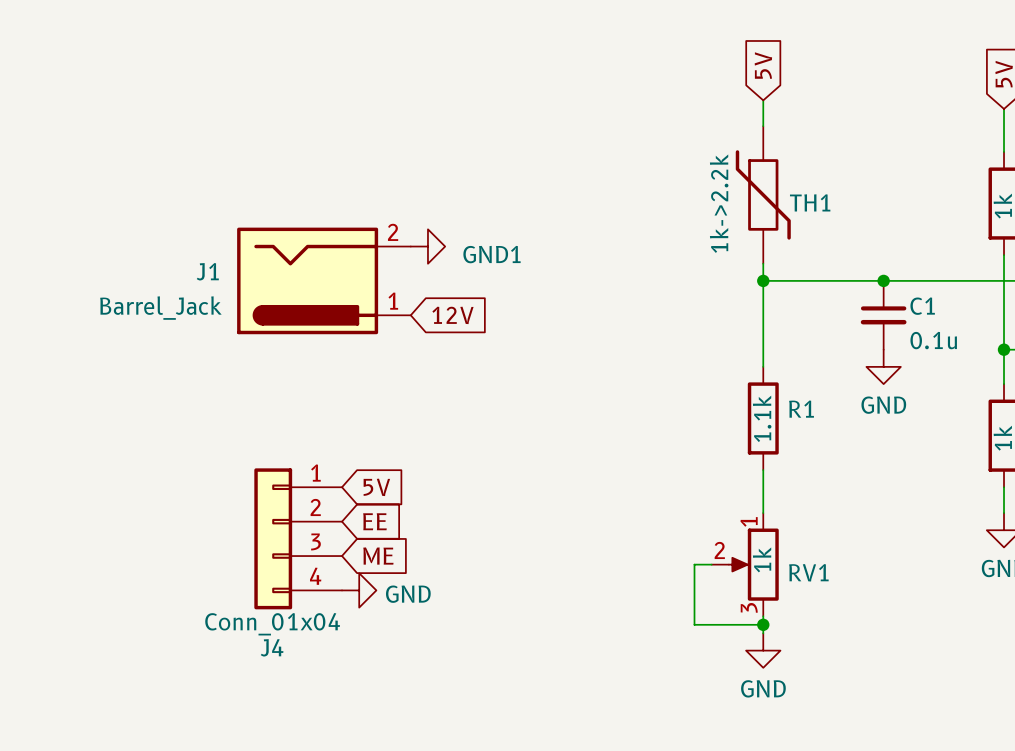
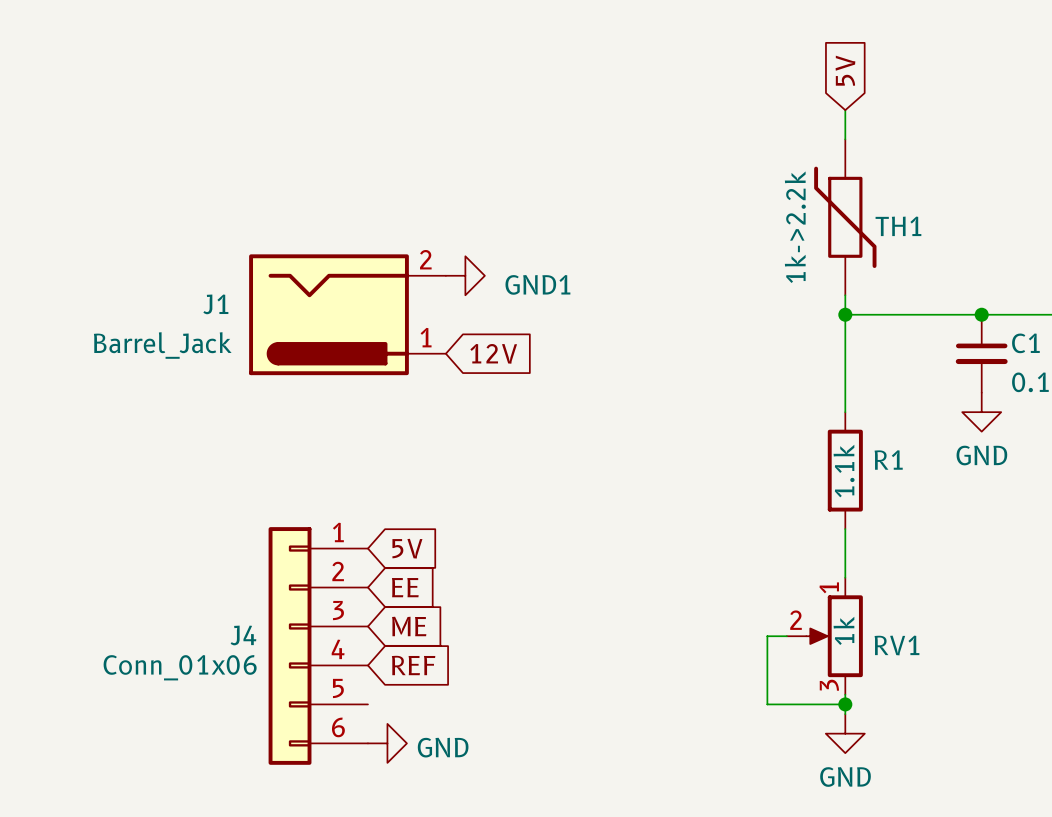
J4 symbol: [254, 468, 343, 610] -> [268, 527, 368, 765]
power symbol position: GND (359, 590) -> GND (387, 743)
global label: none -> REF (413, 665)
J4 value: Conn_01x04 (272, 624) -> Conn_01x06 (180, 667)
J4 name position: J4 (272, 647) -> J4 (243, 635)

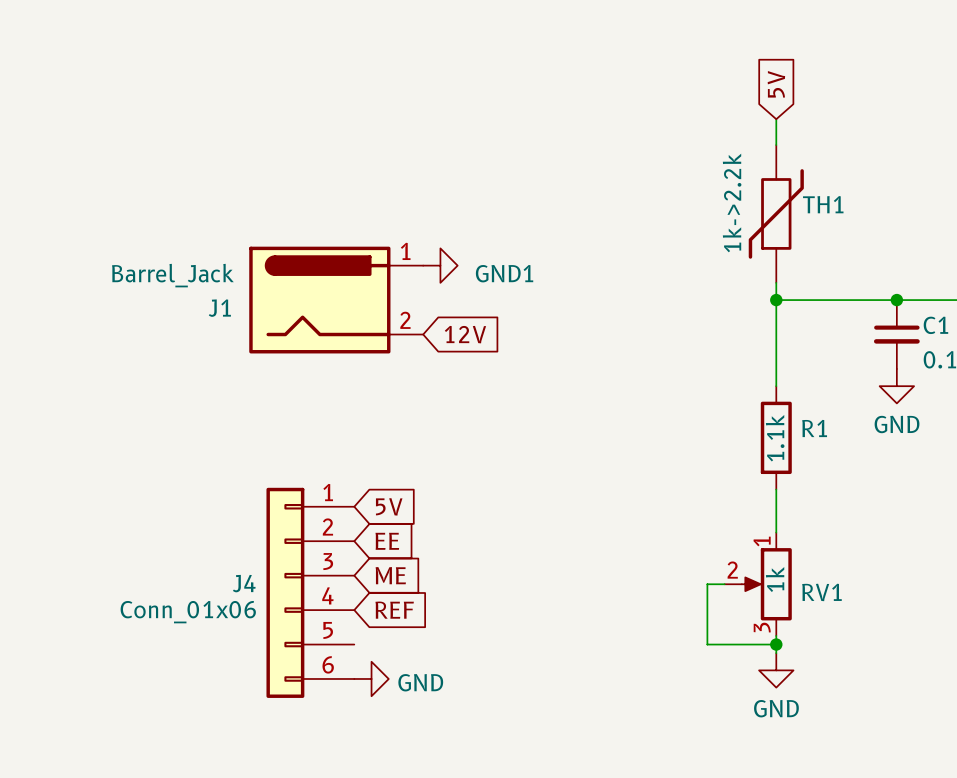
TH1 flip: as is (845, 217) -> up-down (776, 213)
J1 flip: as is (328, 314) -> up-down (319, 300)

